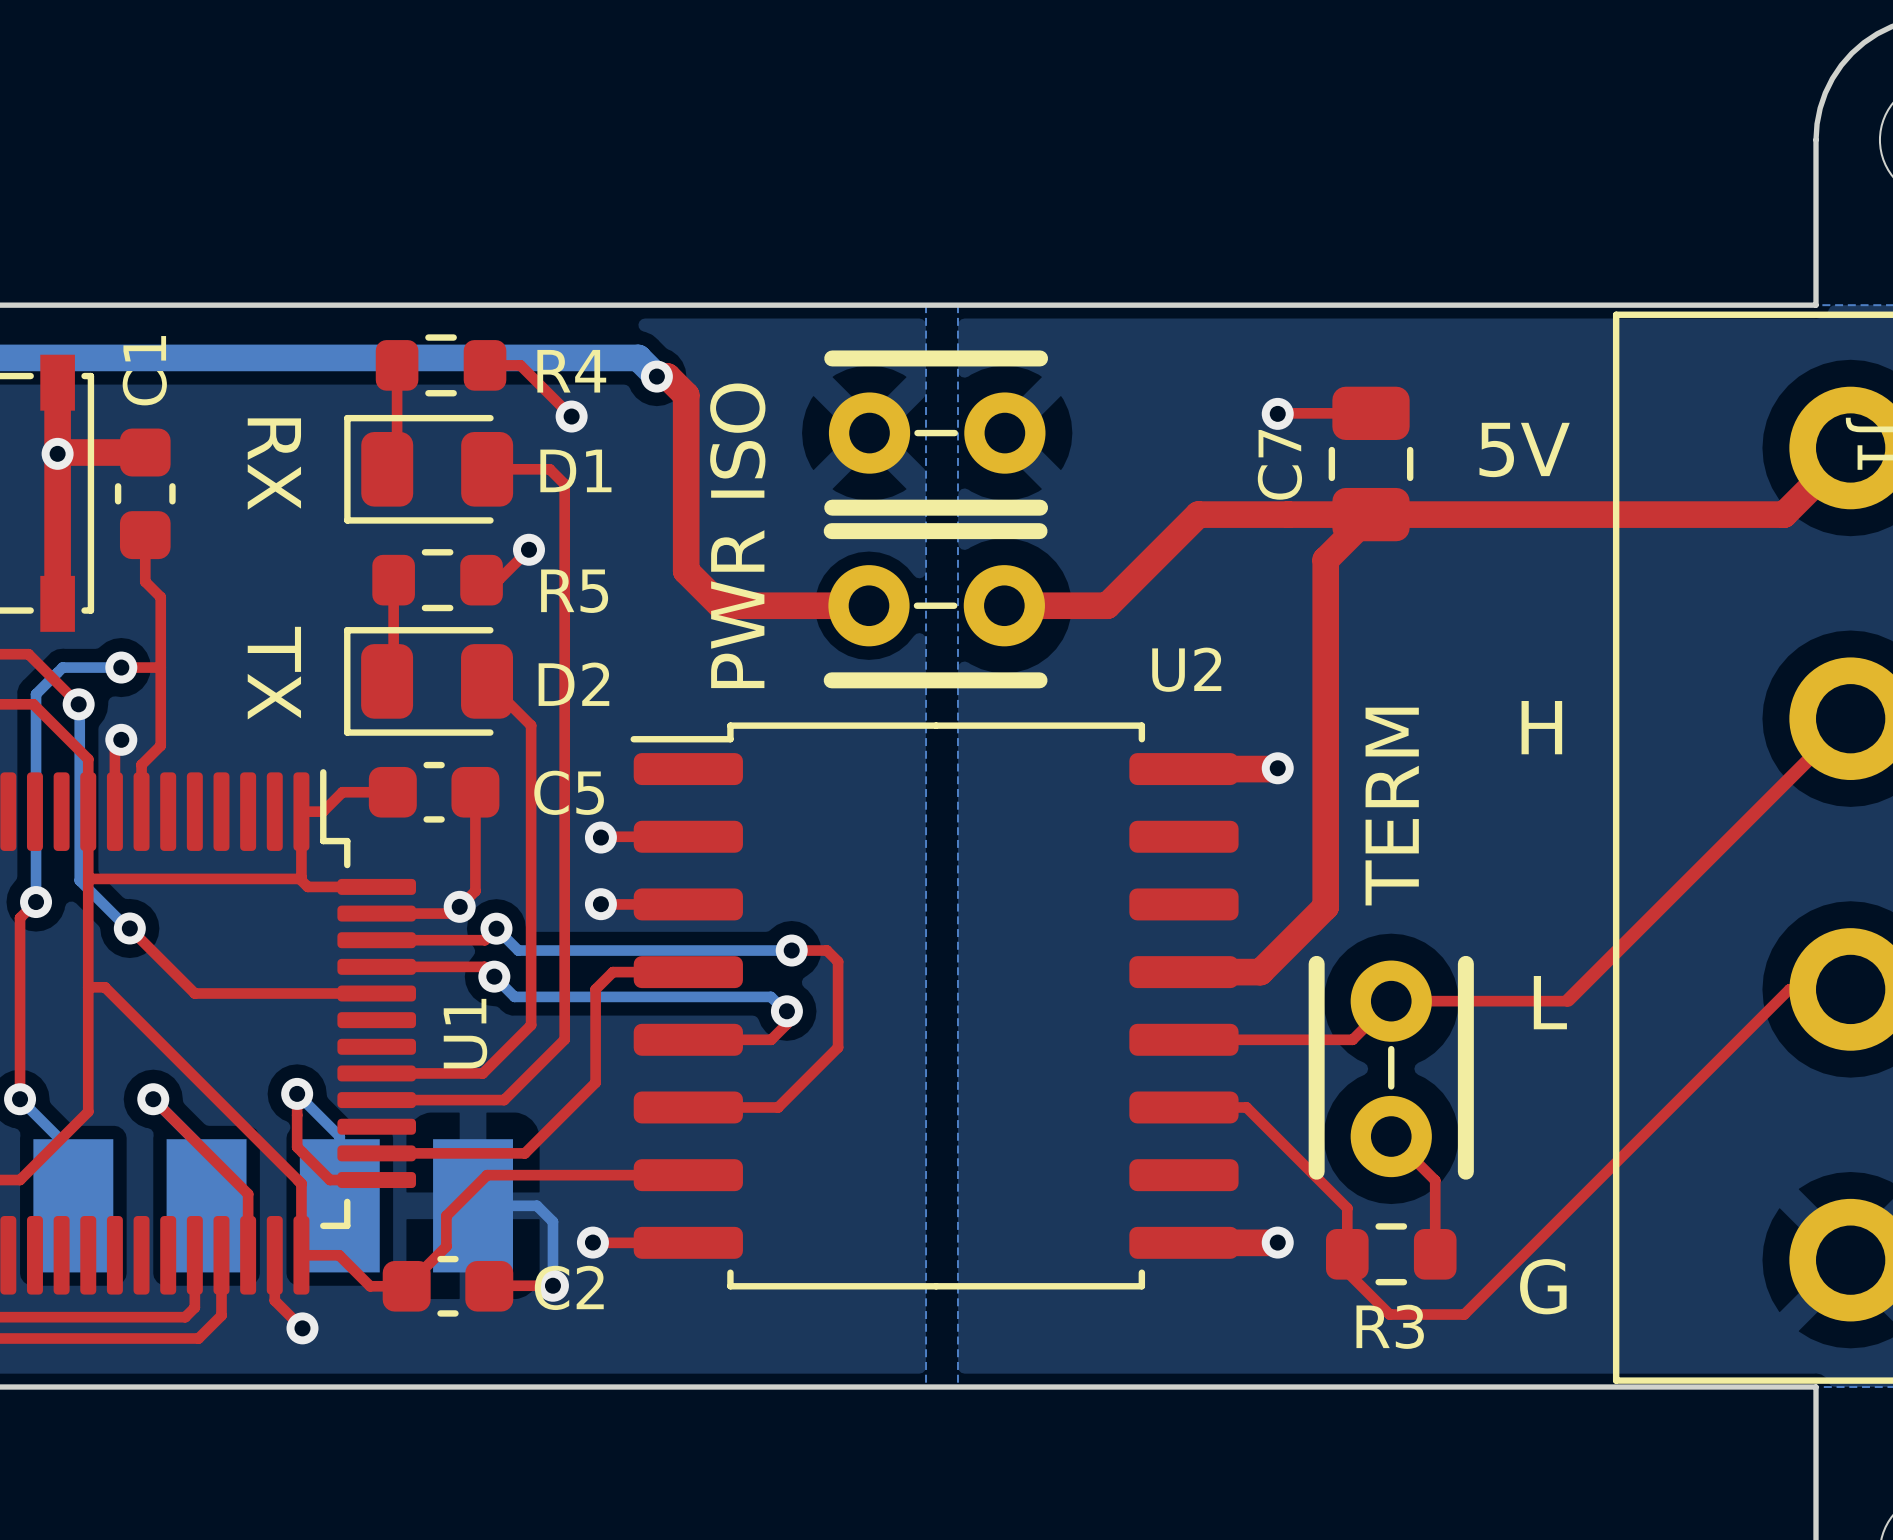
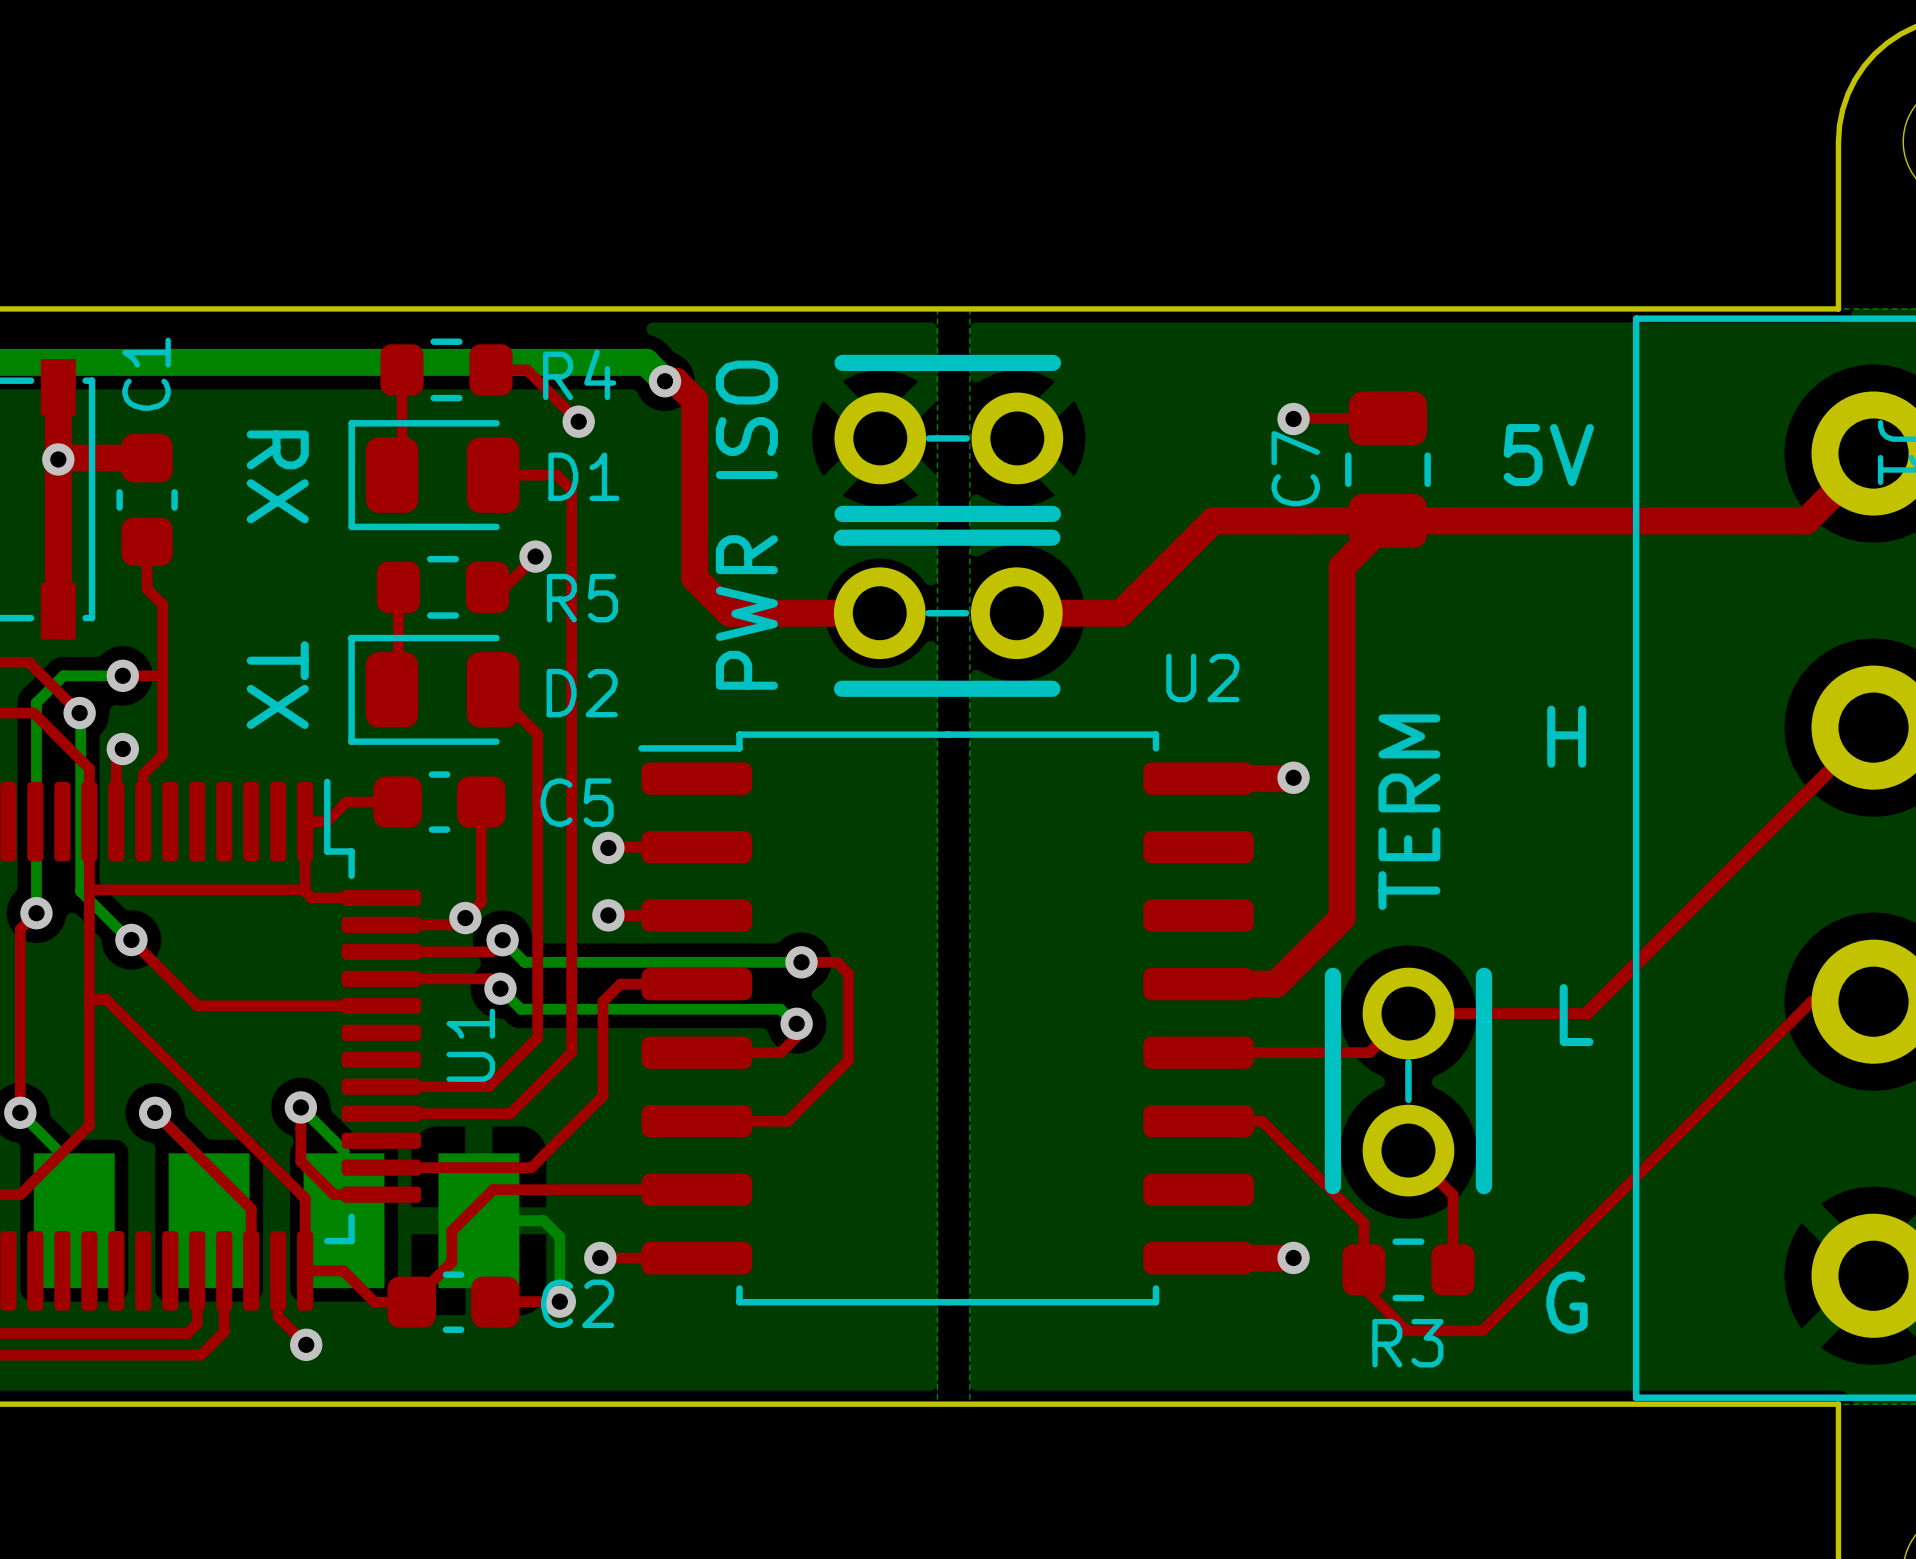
part footprint: [824, 350, 1049, 516] -> [834, 354, 1064, 523]
part footprint: [823, 523, 1048, 689] -> [833, 529, 1063, 697]
part footprint: [1308, 955, 1474, 1180] -> [1324, 967, 1493, 1197]

